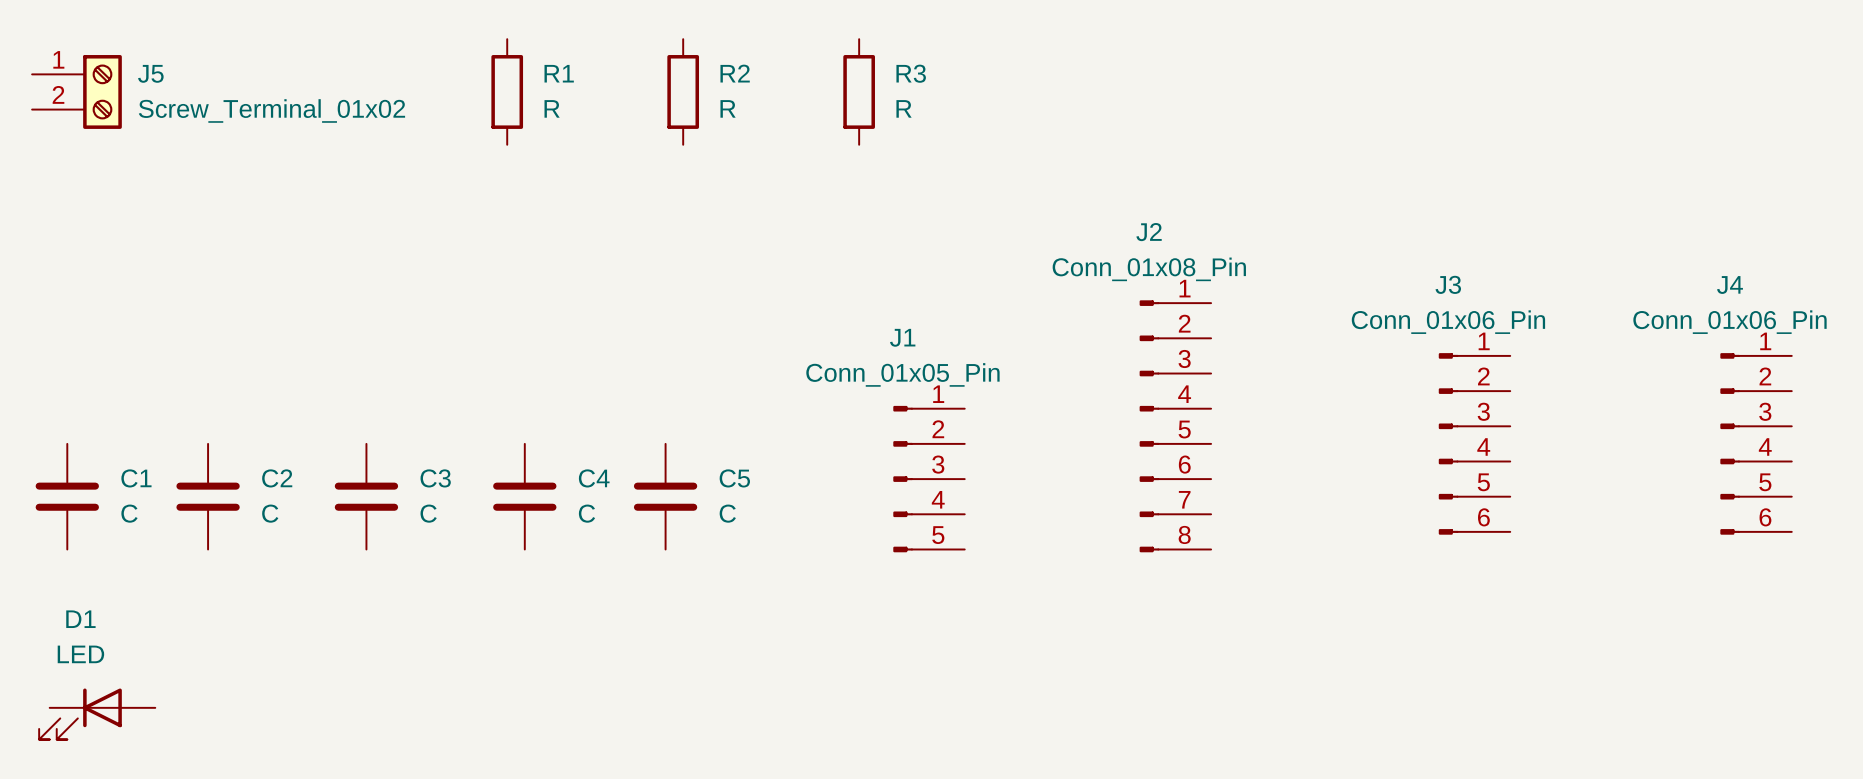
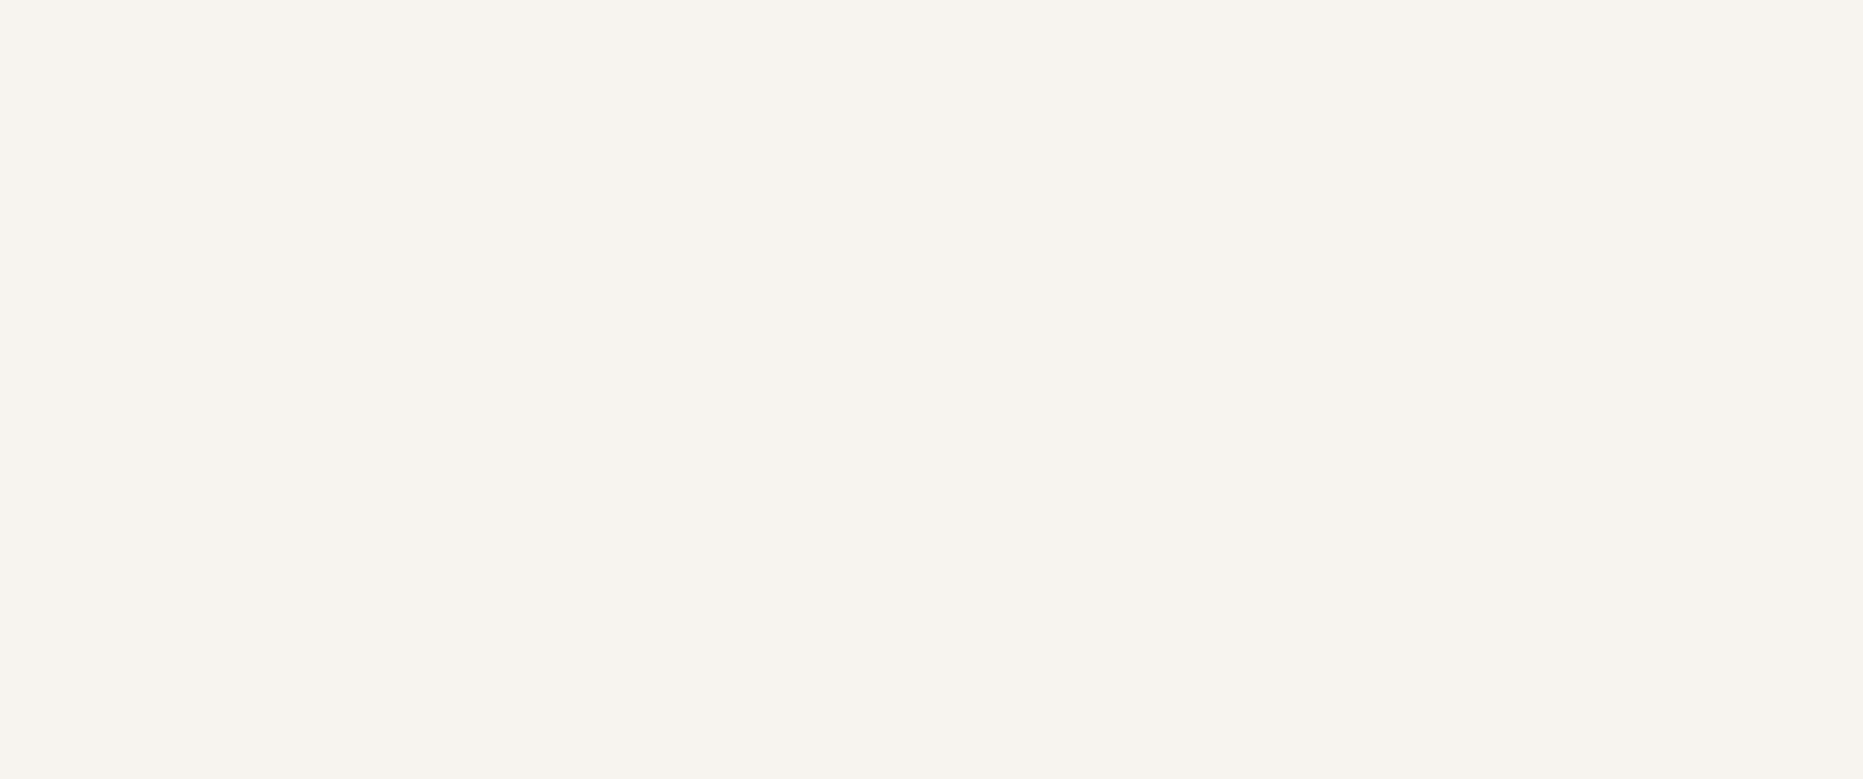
J5: Screw_Terminal_01x02 (76, 91) -> none
R1: R (507, 91) -> none
R2: R (683, 91) -> none
R3: R (859, 91) -> none
J2: Conn_01x08_Pin (1175, 426) -> none
J3: Conn_01x06_Pin (1474, 443) -> none
J4: Conn_01x06_Pin (1756, 443) -> none
J1: Conn_01x05_Pin (929, 479) -> none
C1: C (67, 496) -> none
C2: C (208, 496) -> none
C3: C (366, 496) -> none
C4: C (524, 496) -> none
C5: C (665, 496) -> none
D1: LED (97, 714) -> none

